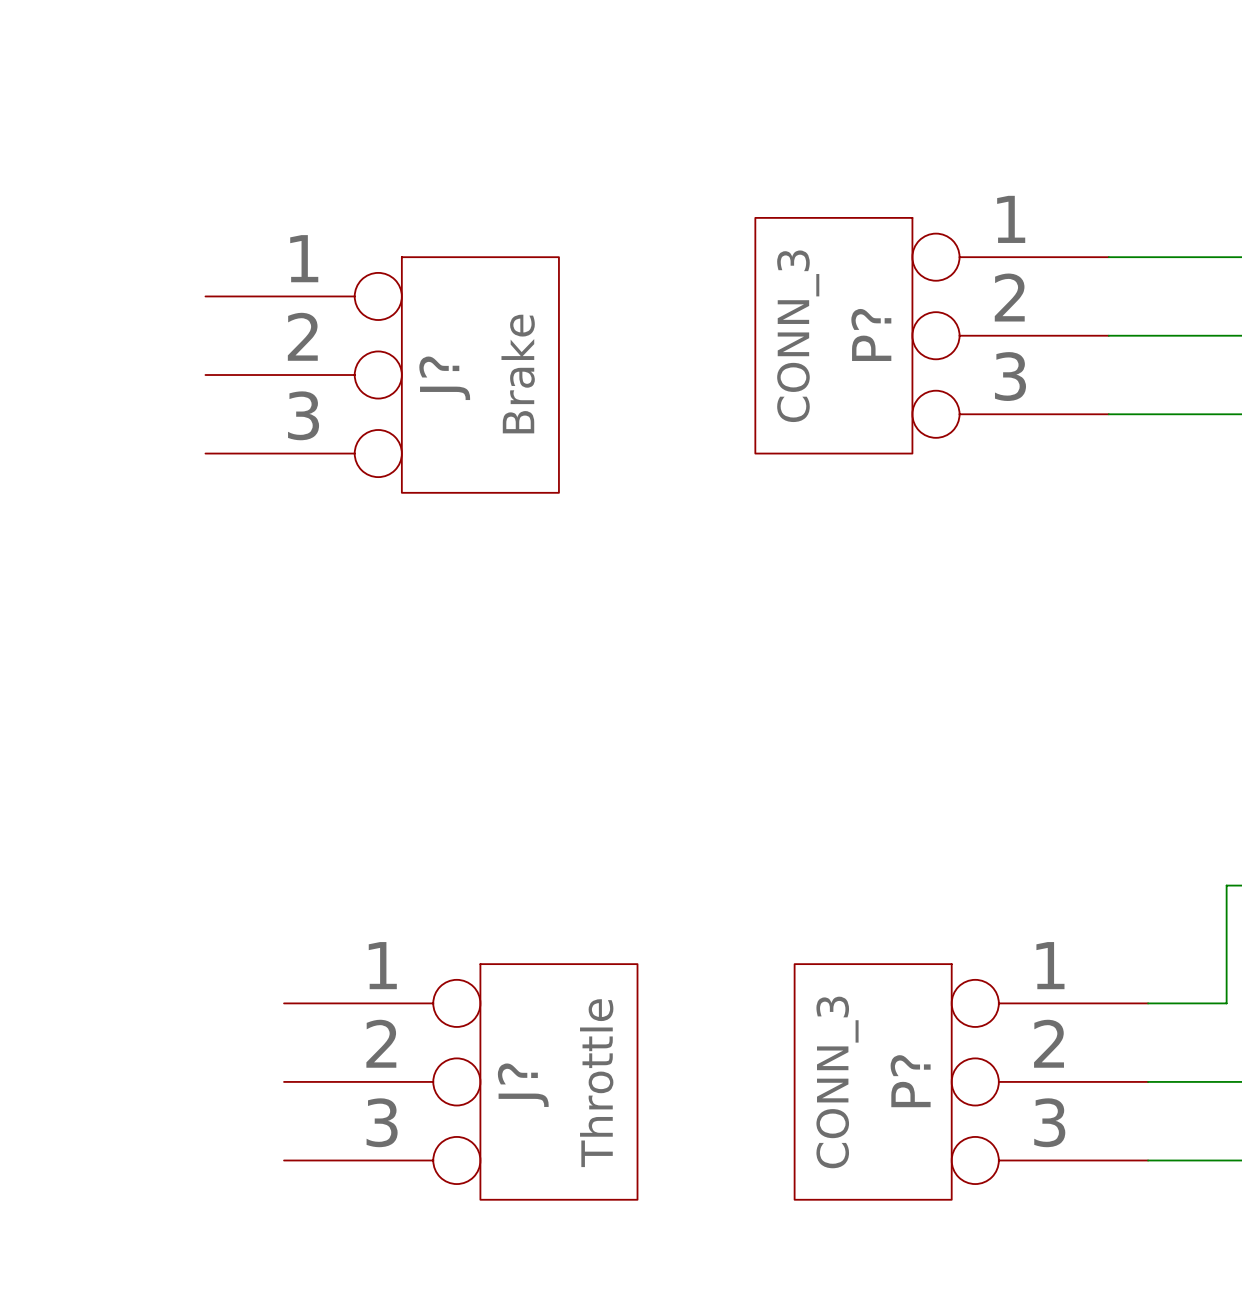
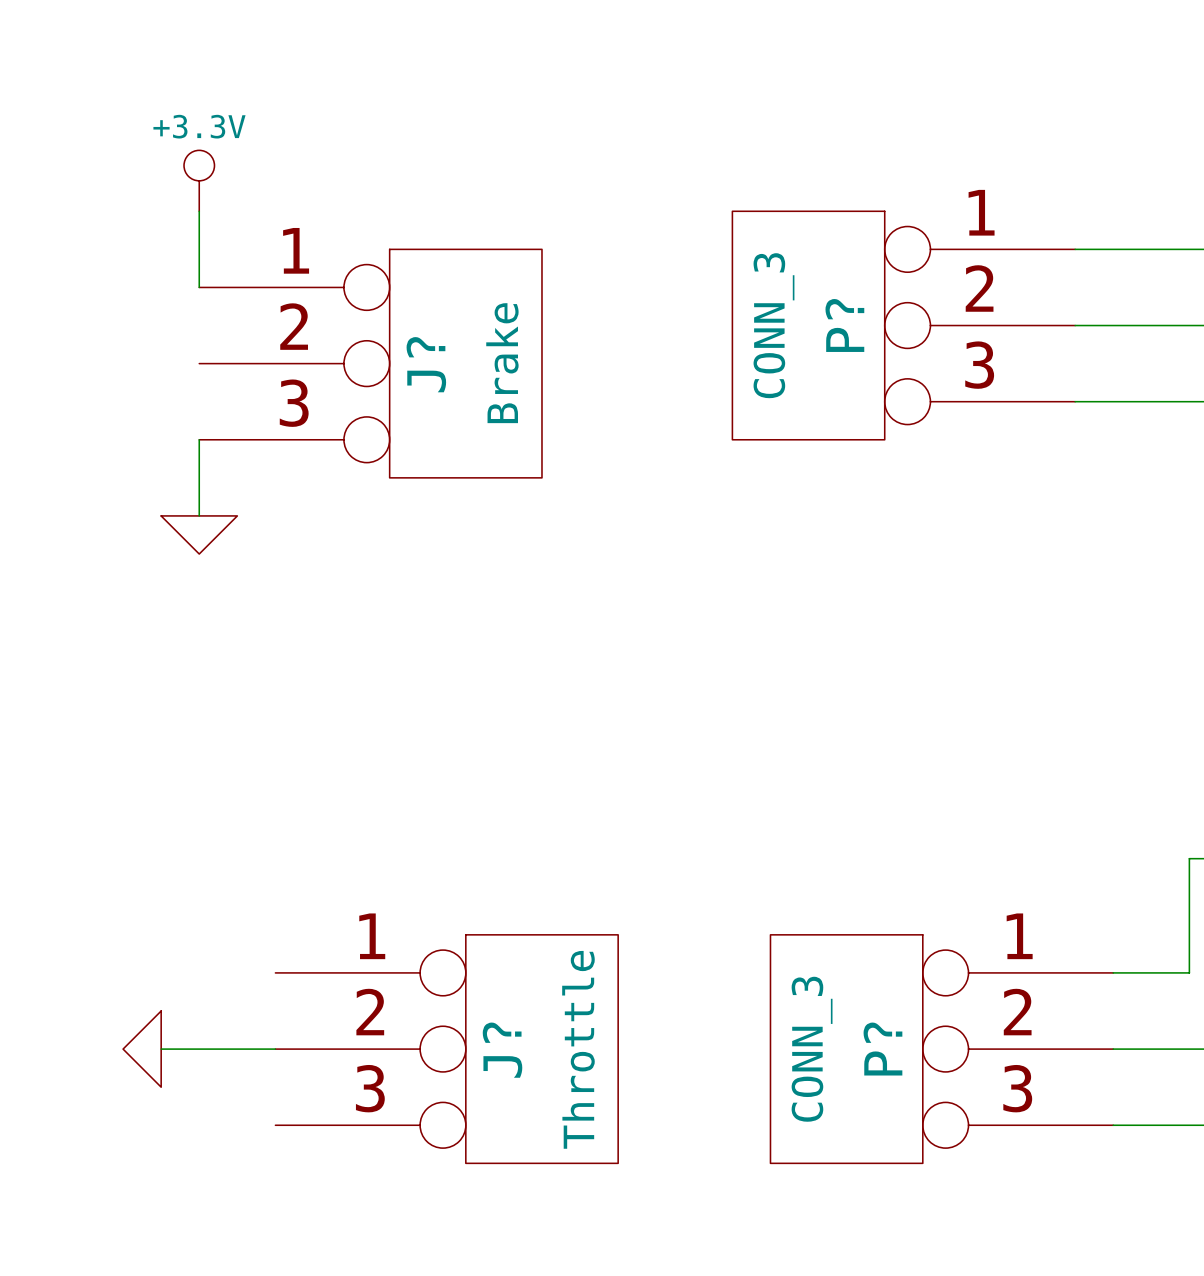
power symbol: none -> +3.3V (199, 180)
wire: none -> (199, 211) (199, 287)
wire: none -> (199, 439) (199, 515)
power symbol: none -> (199, 534)
power symbol: none -> (142, 1049)
wire: none -> (161, 1049) (275, 1049)

